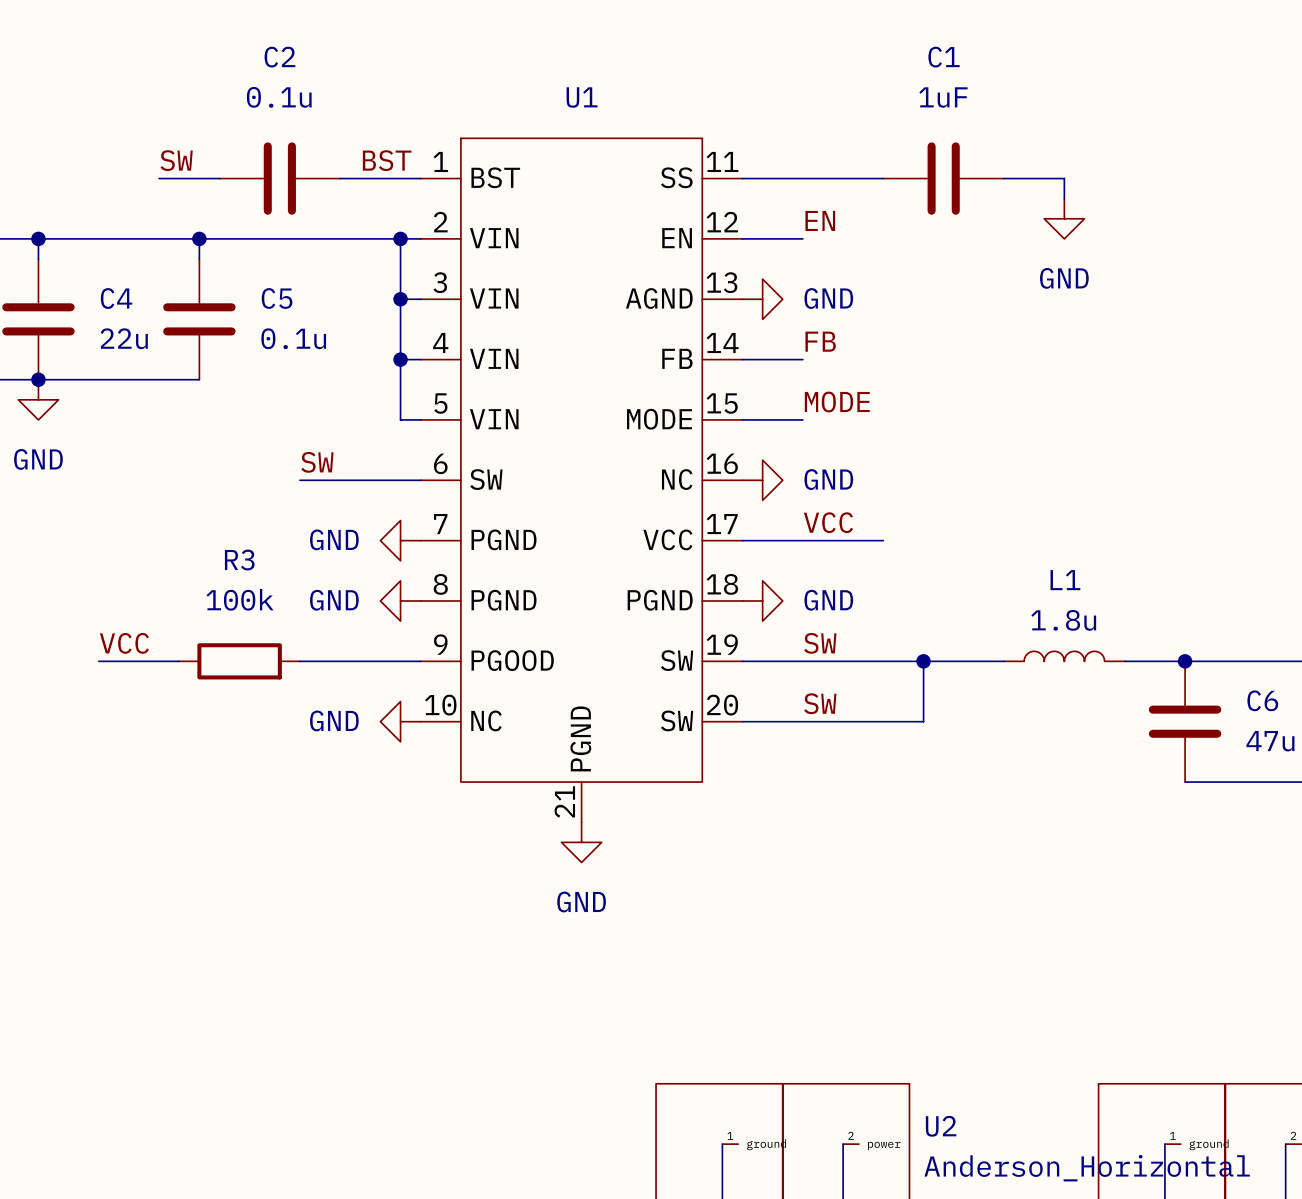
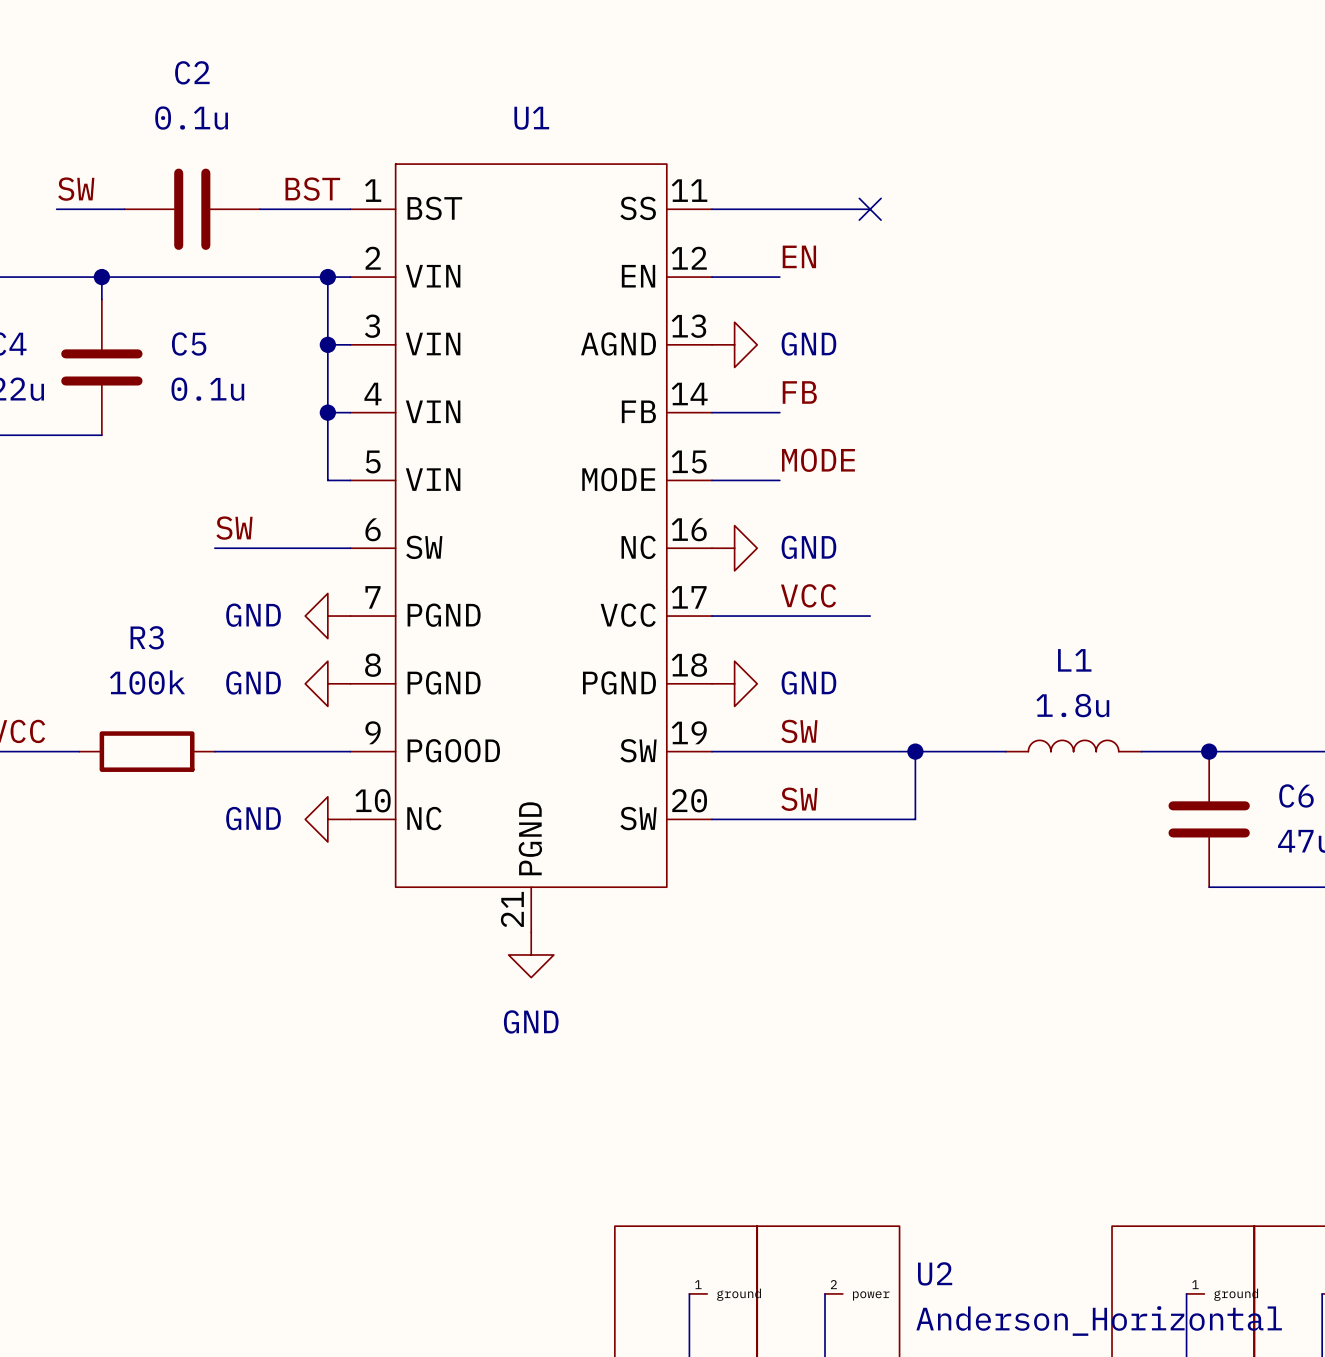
no-connect mark: none -> (870, 209)
C1: 1uF (943, 178) -> none
wire: (1004, 178) (1064, 178) (1064, 198) -> none
power symbol: GND (1064, 218) -> none

